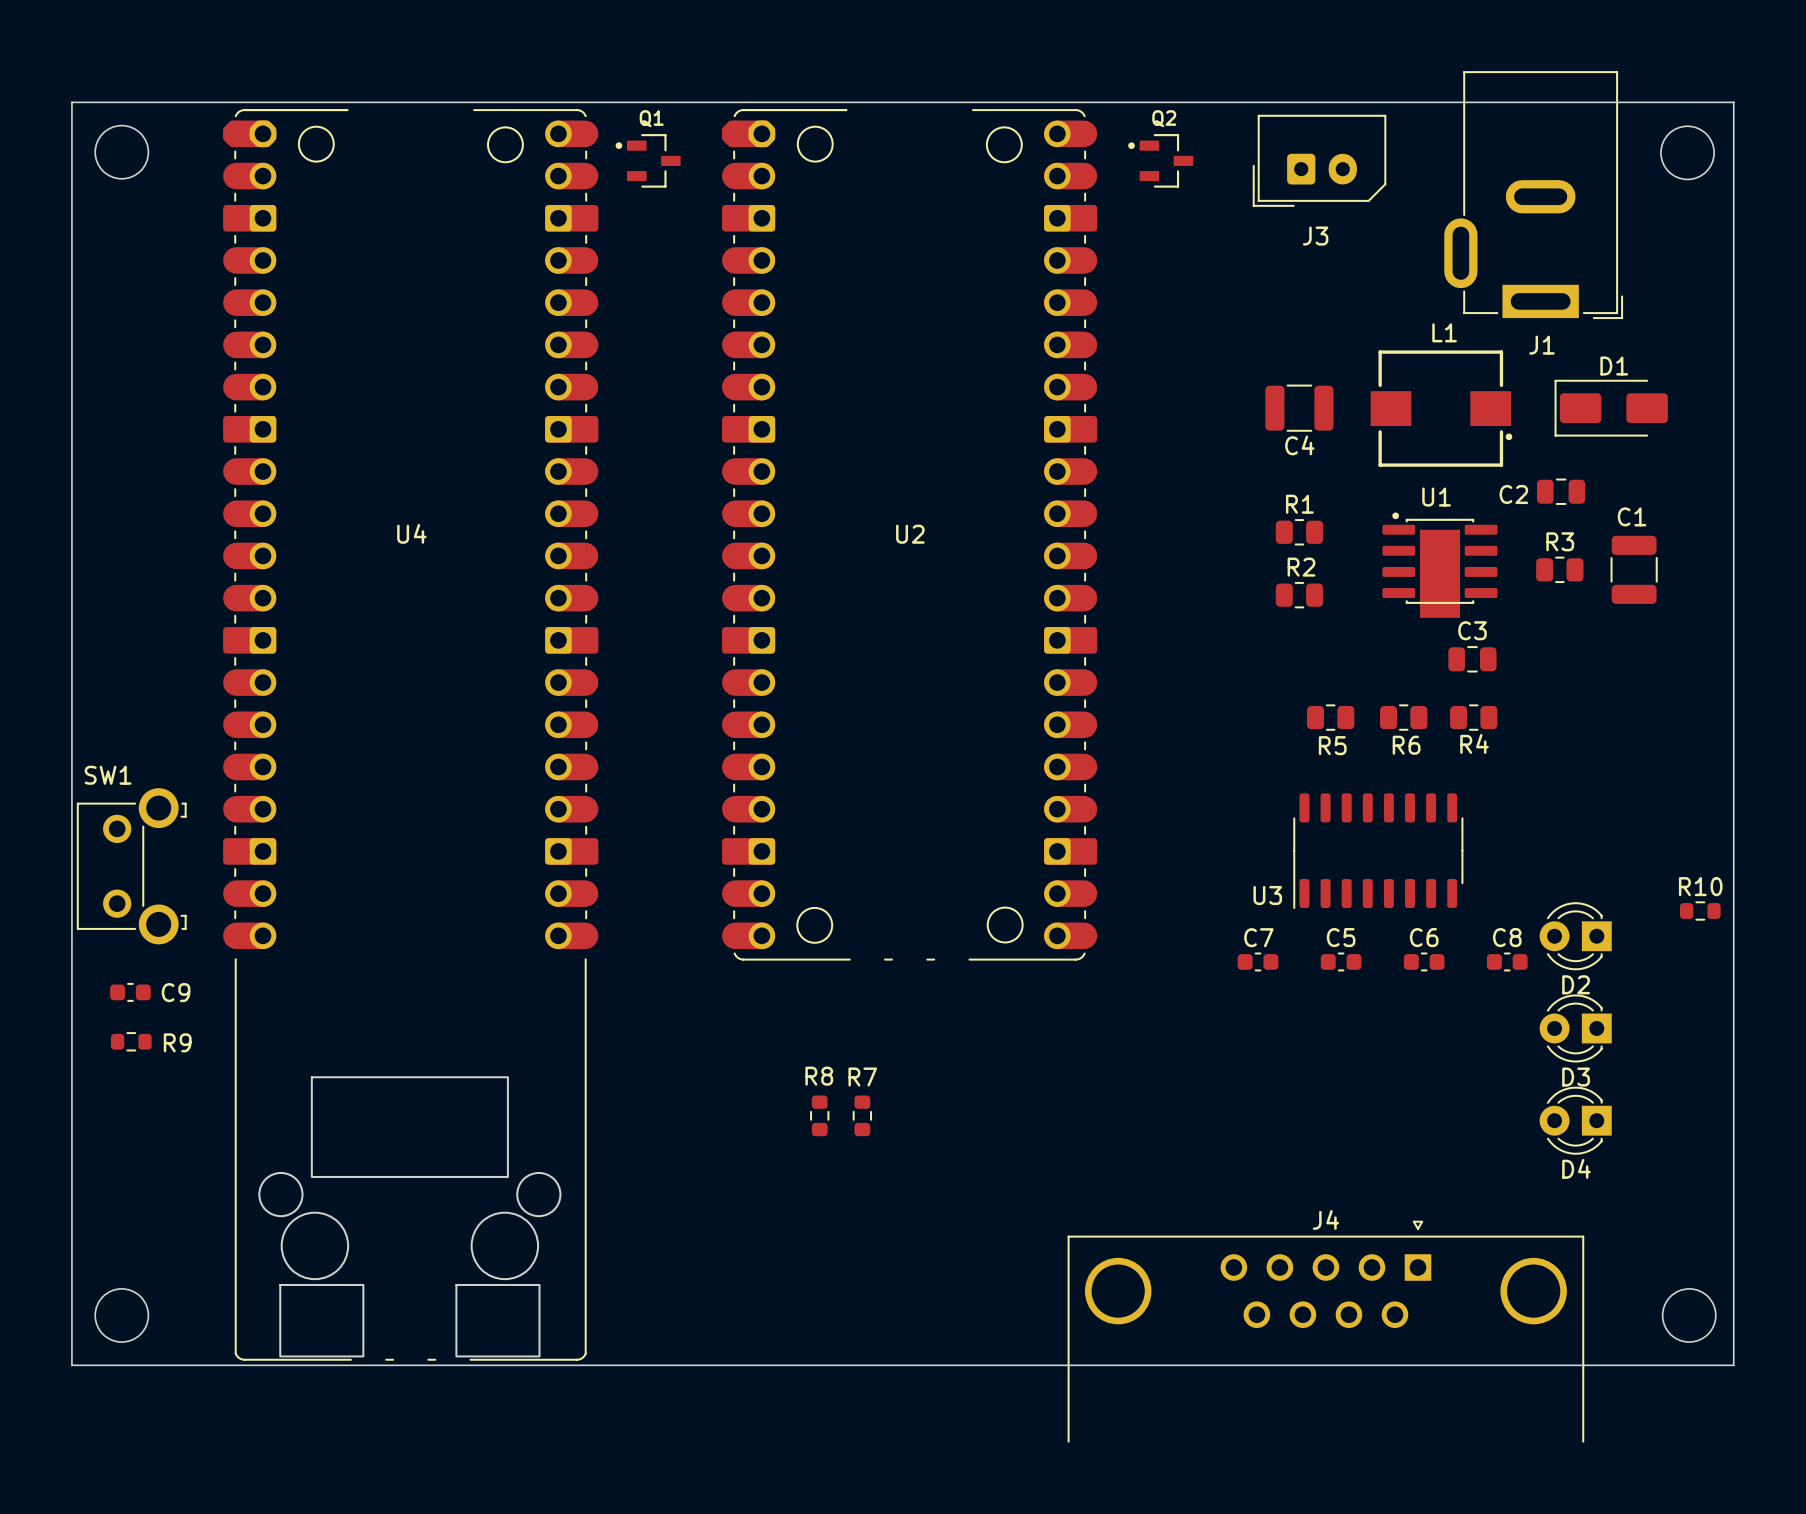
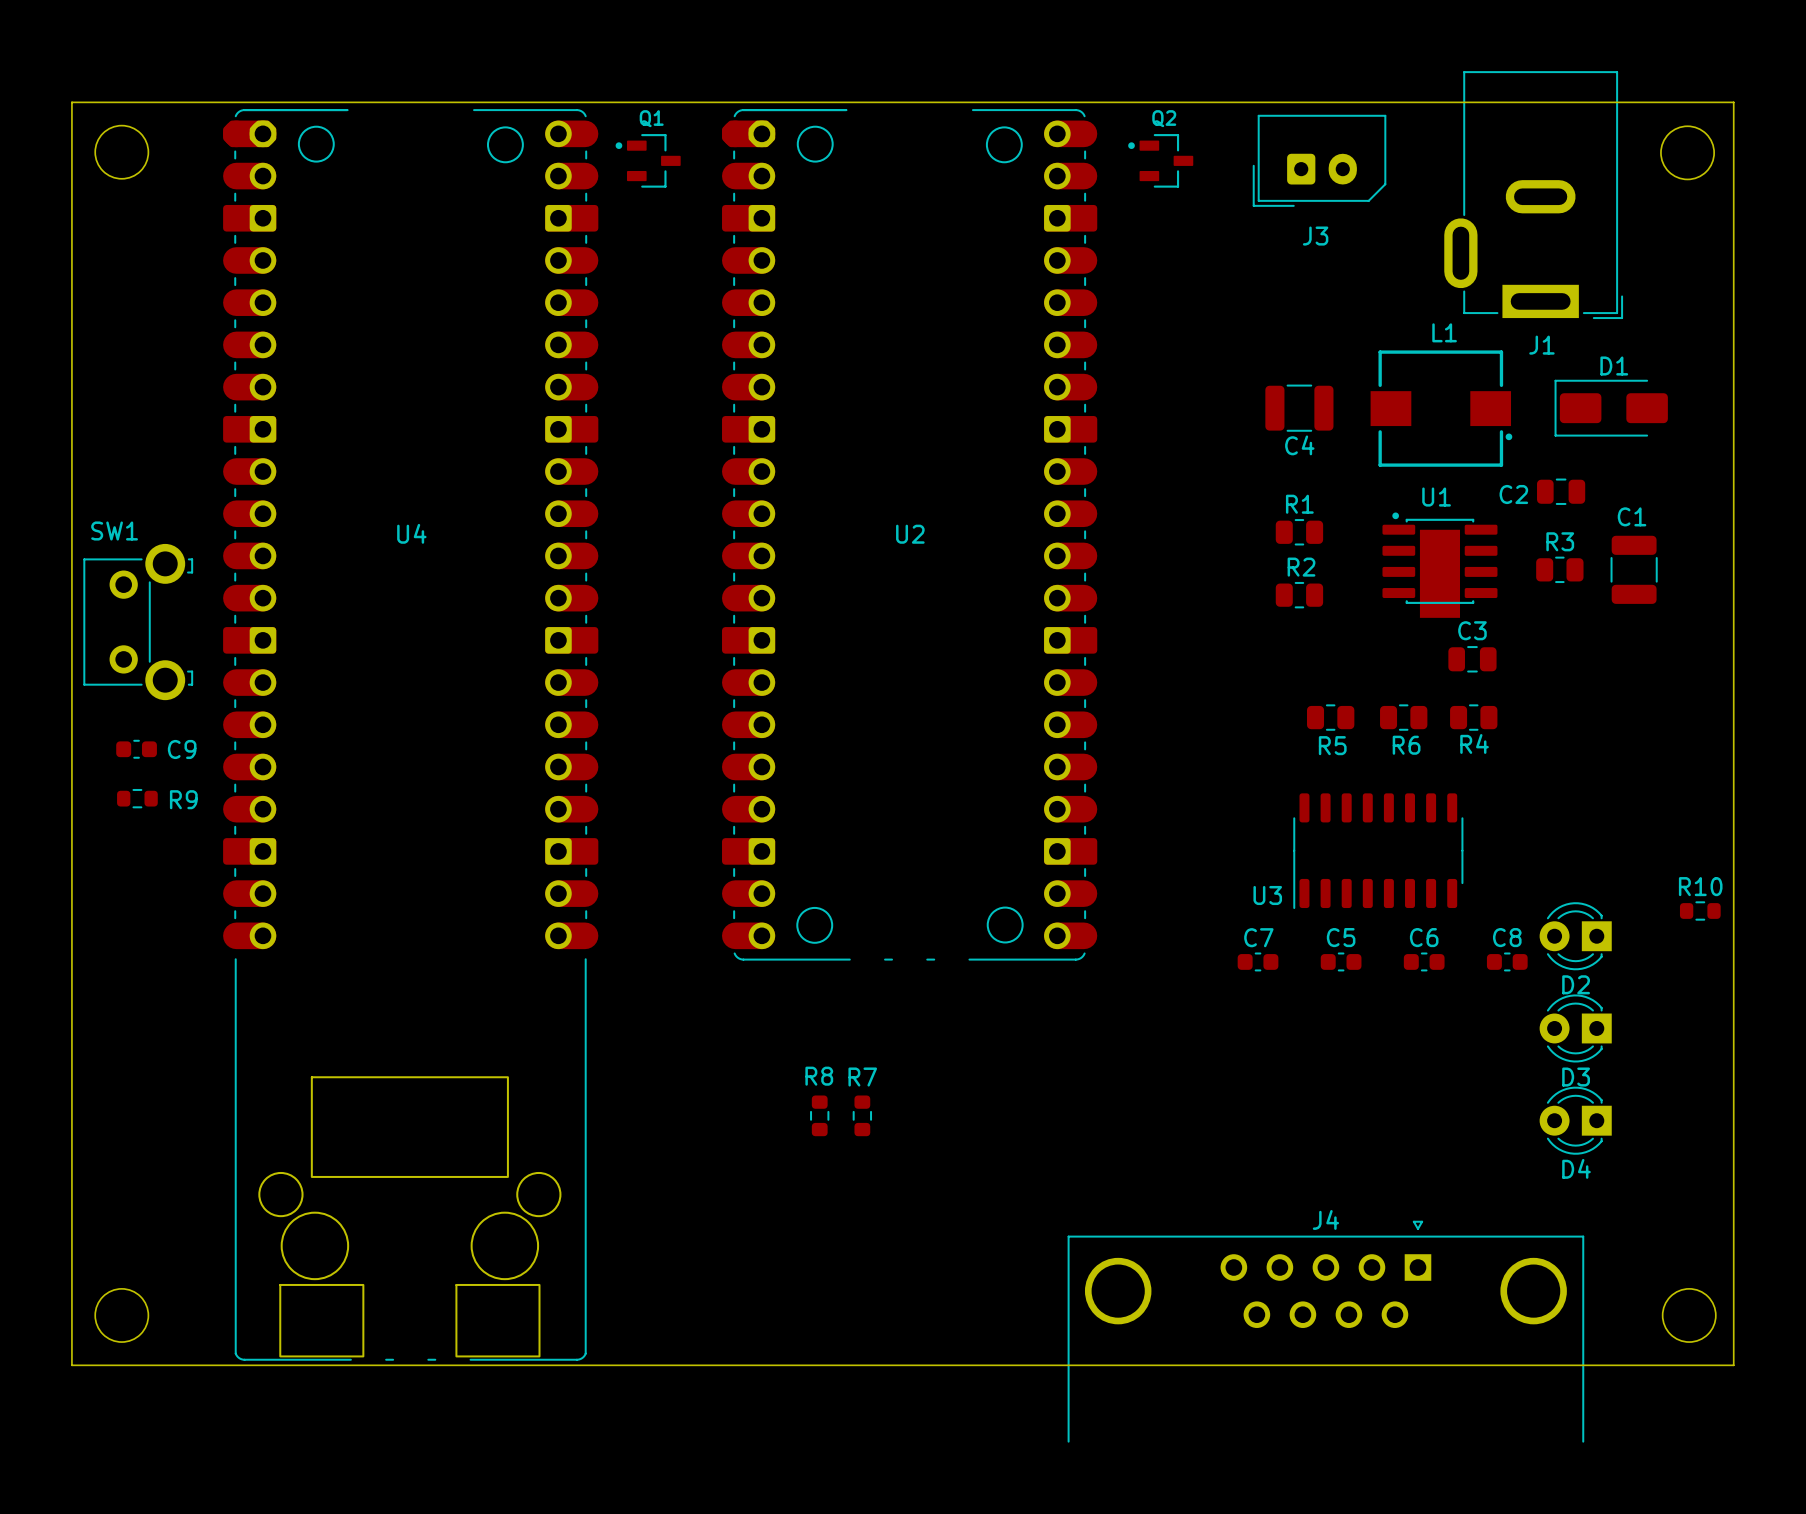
SW1 position: (131, 866) -> (138, 622)
C9 position: (130, 992) -> (136, 749)
R9 position: (131, 1041) -> (137, 798)

